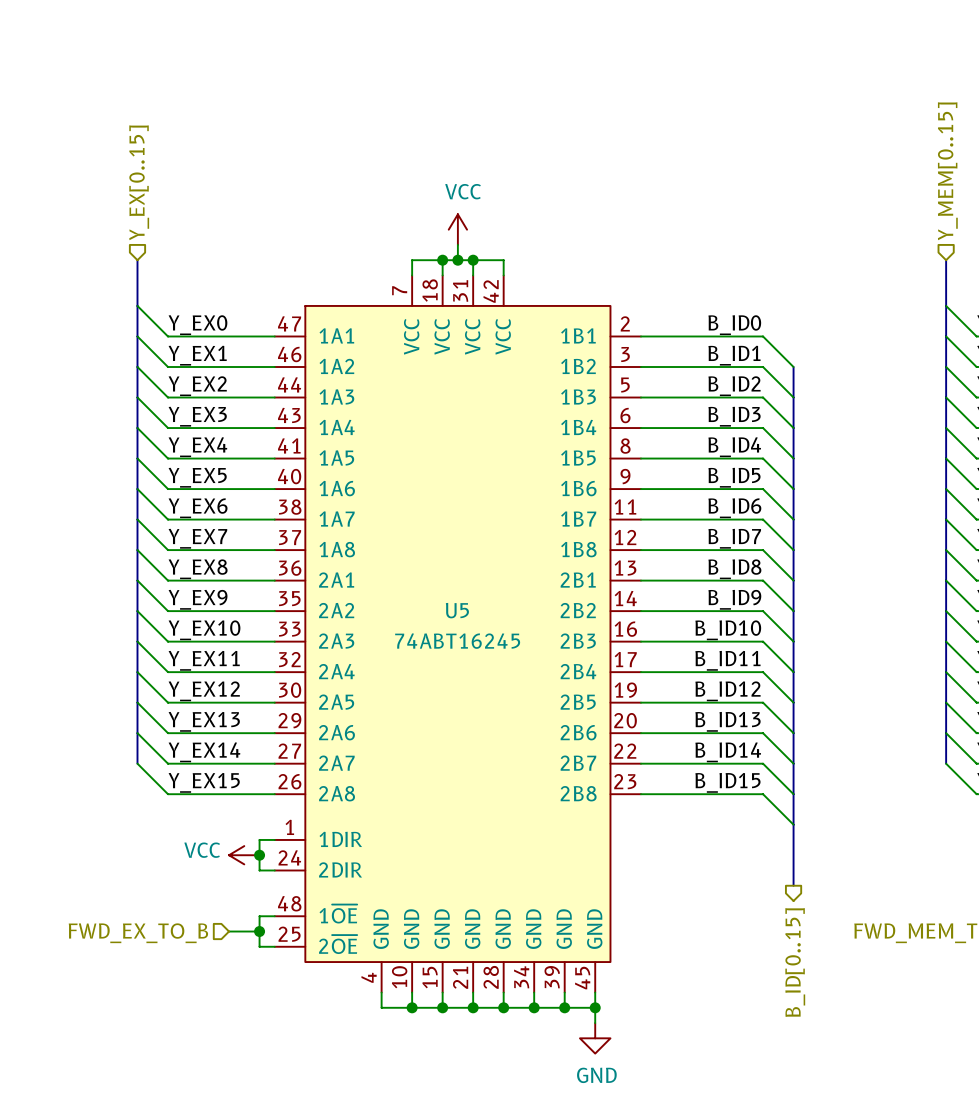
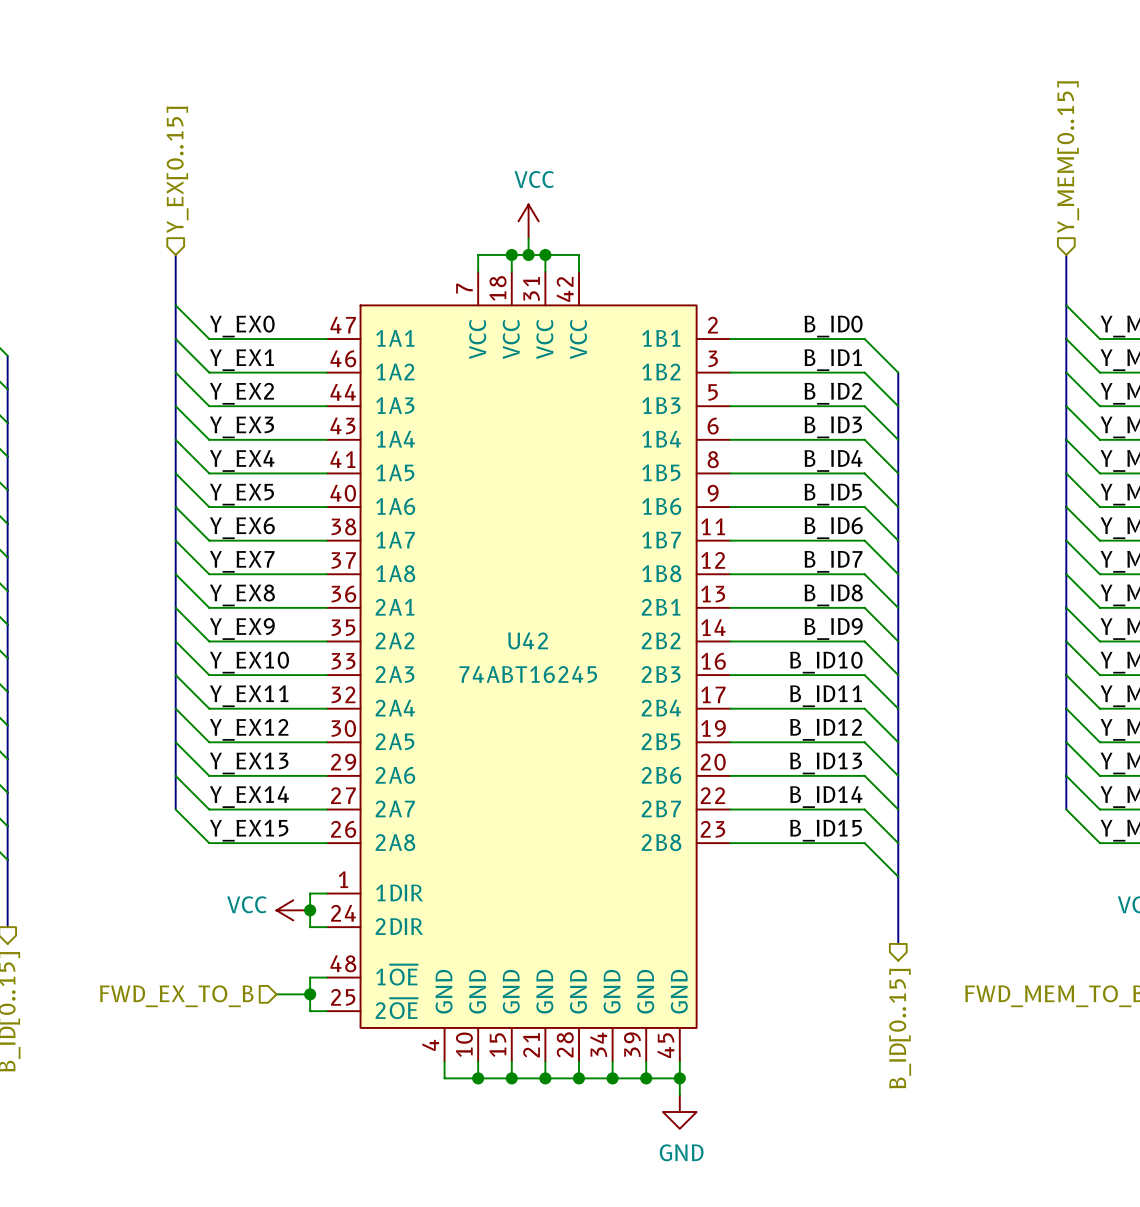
U5 name: U5 (457, 610) -> U42 (528, 640)

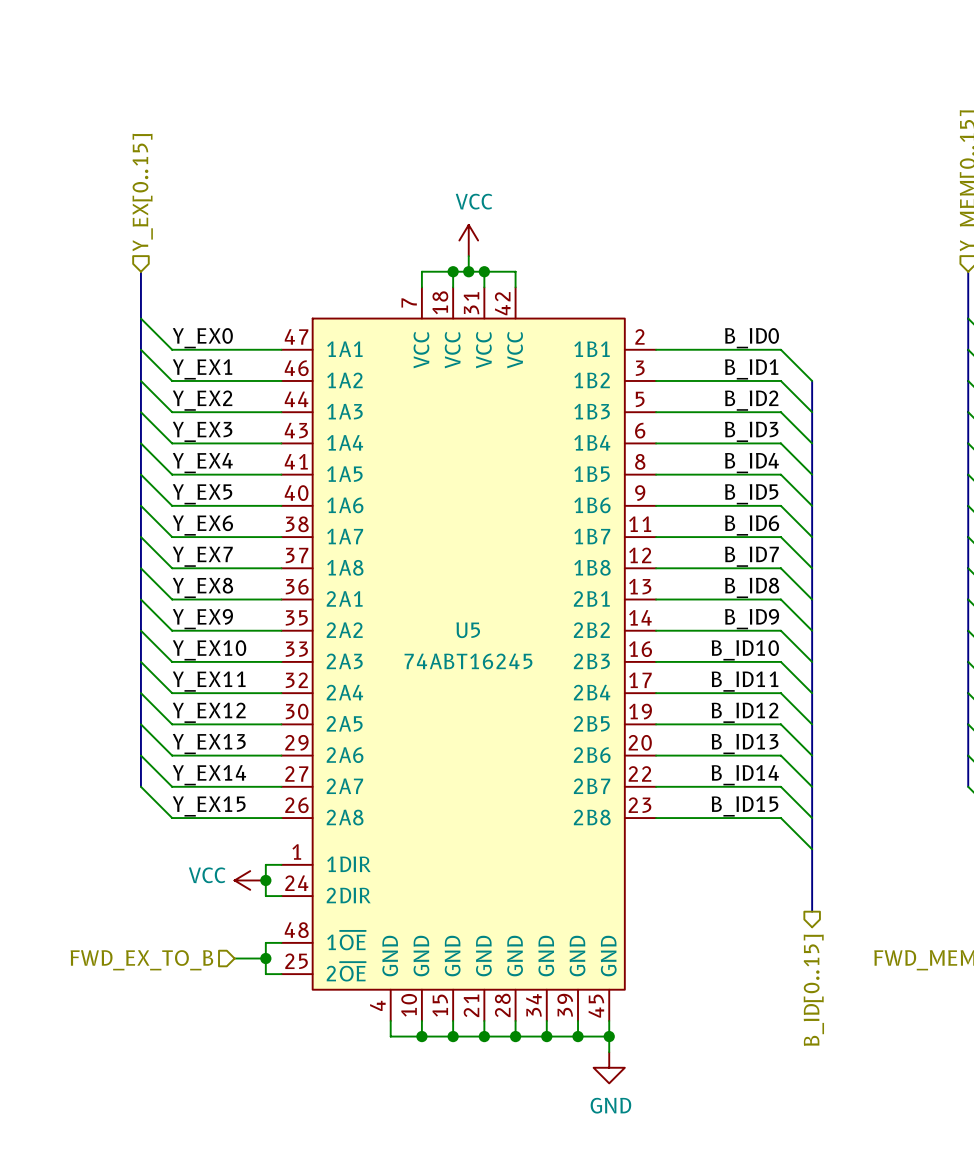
U42 name: U42 (528, 640) -> U5 (468, 630)

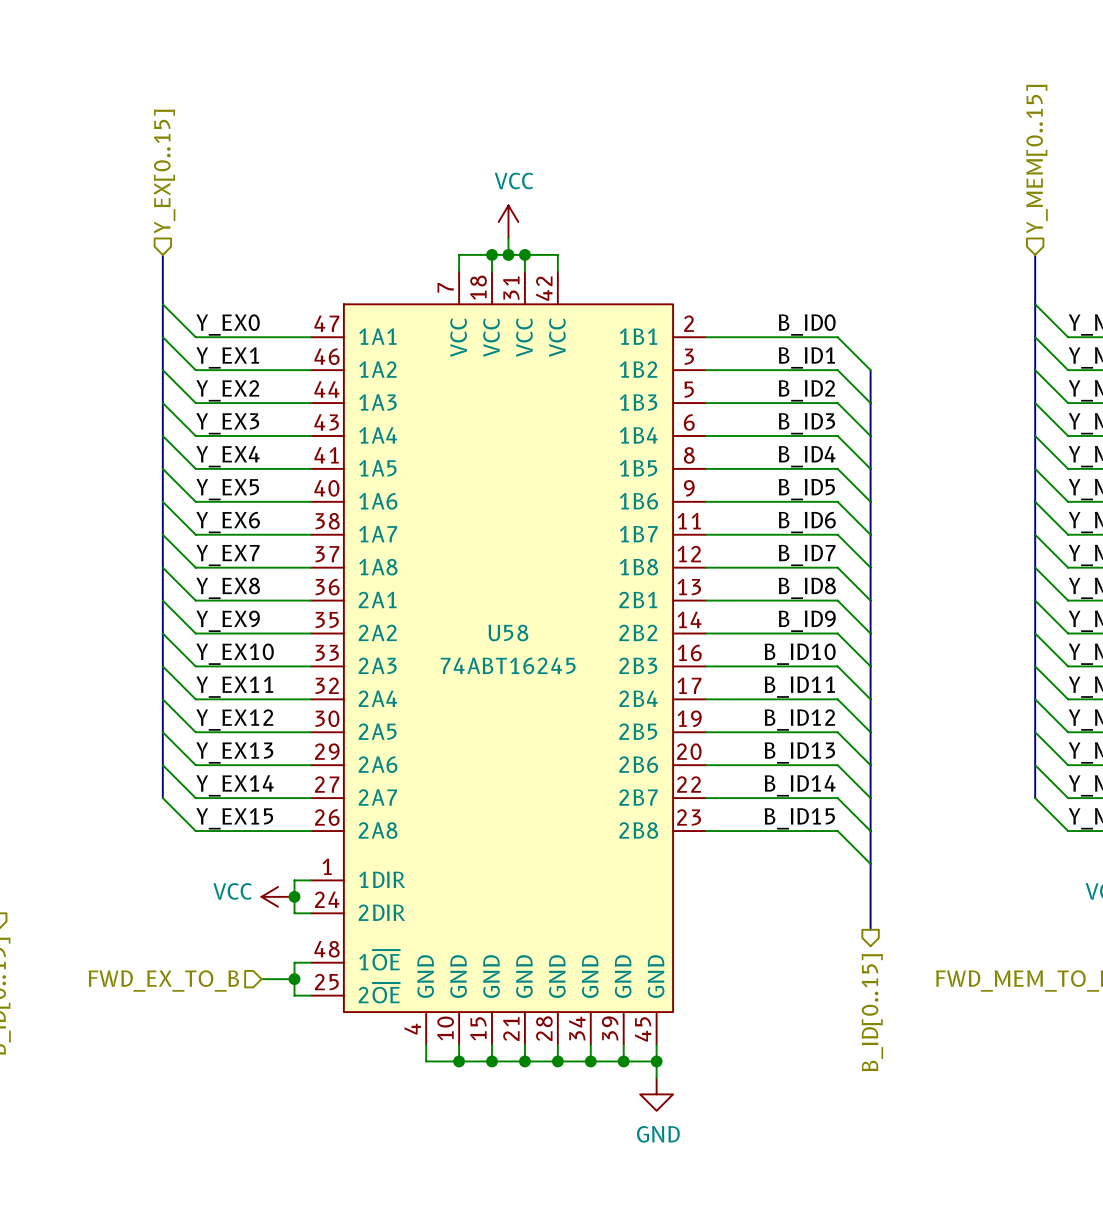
U5 name: U5 (468, 630) -> U58 (508, 632)

